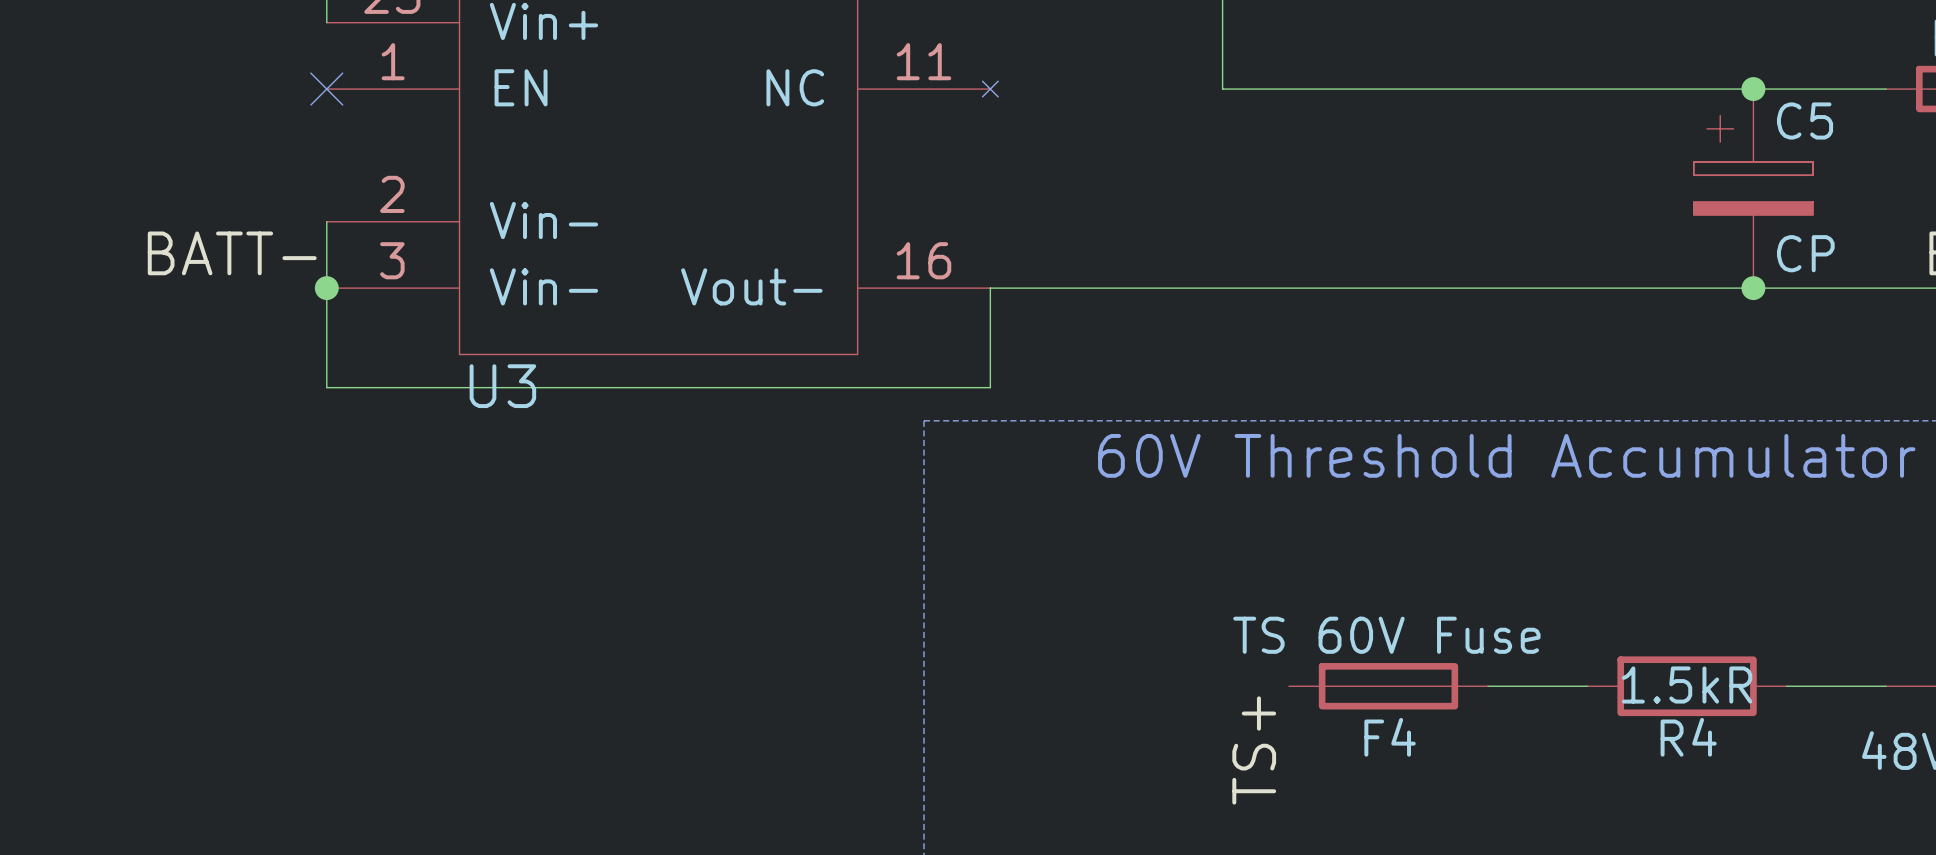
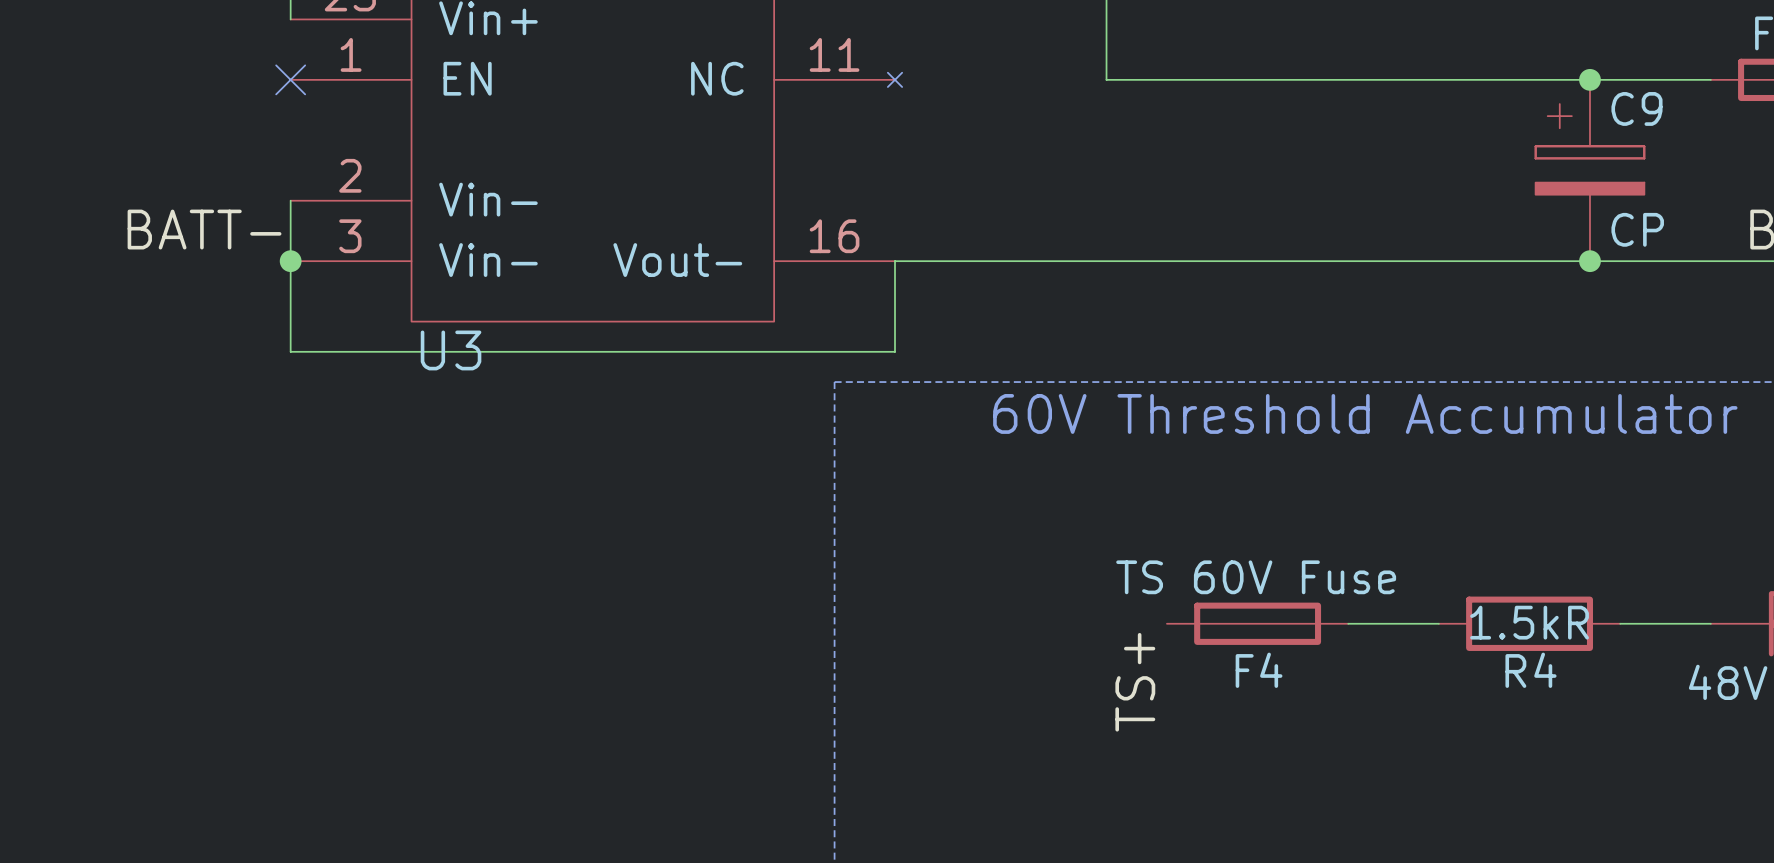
C5 name: C5 (1805, 120) -> C9 (1636, 108)

